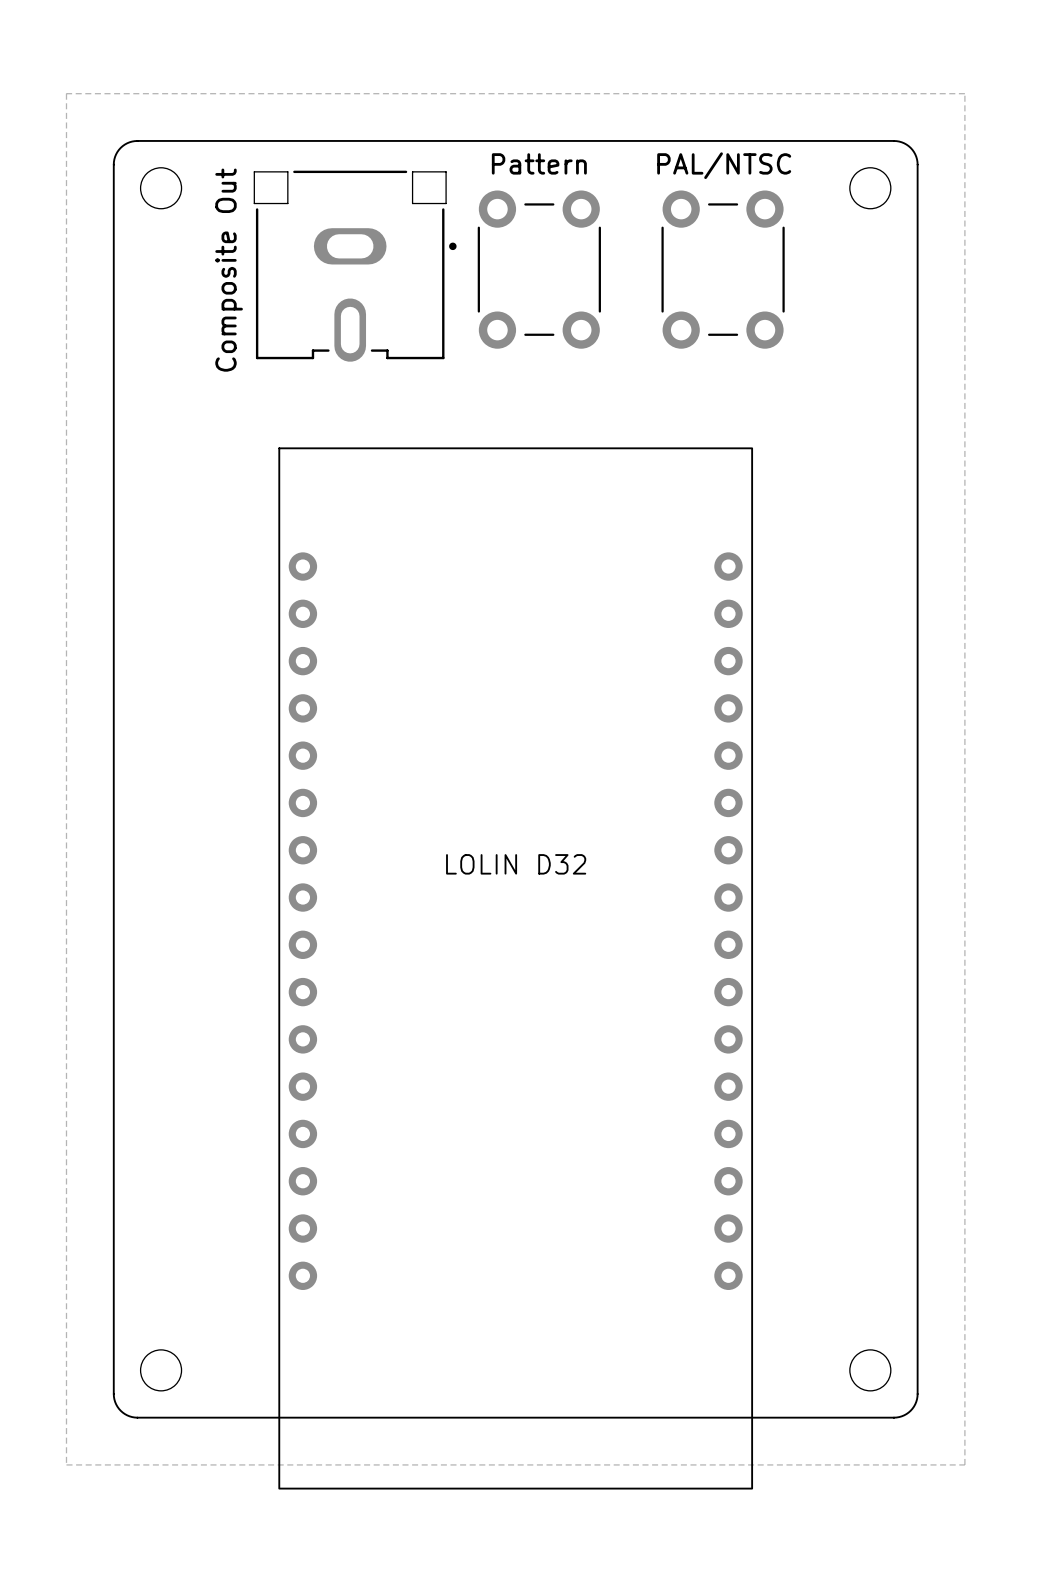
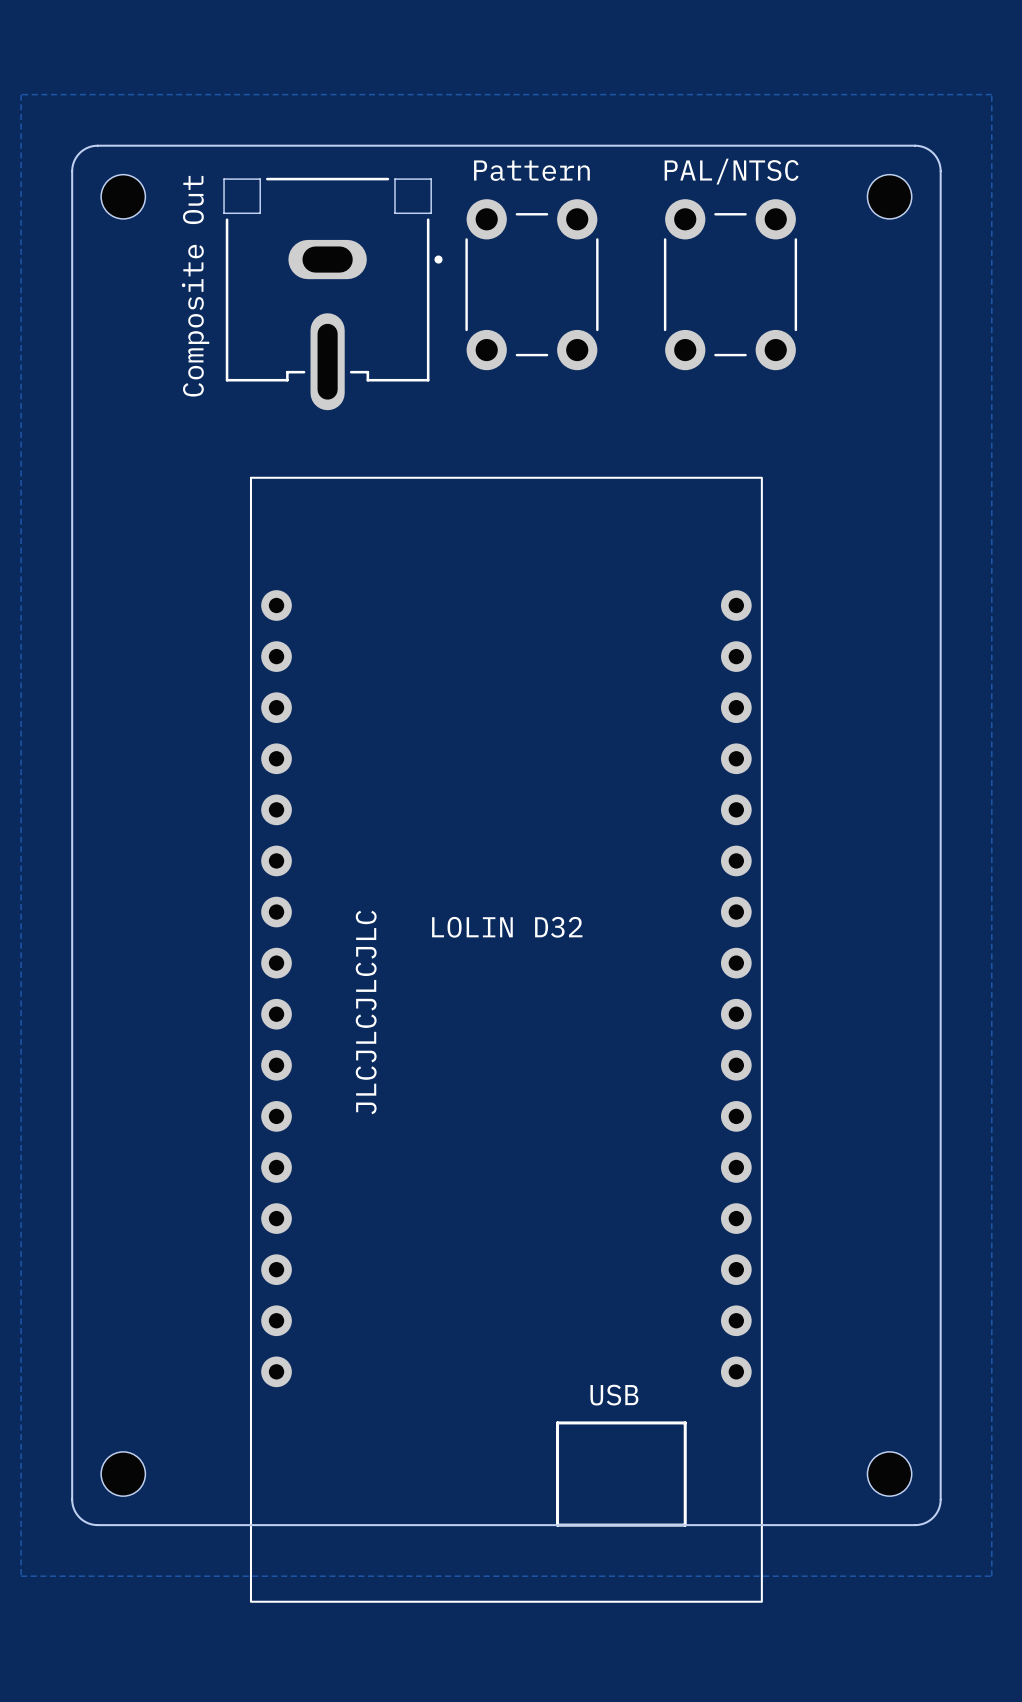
Composite Out footprint: [254, 170, 457, 362] -> [223, 177, 443, 411]
text: none -> JLCJLCJLCJLC (366, 1012)
text: none -> USB (614, 1395)
line: none -> (557, 1422) (685, 1422) (685, 1525) (557, 1525) (557, 1422)

